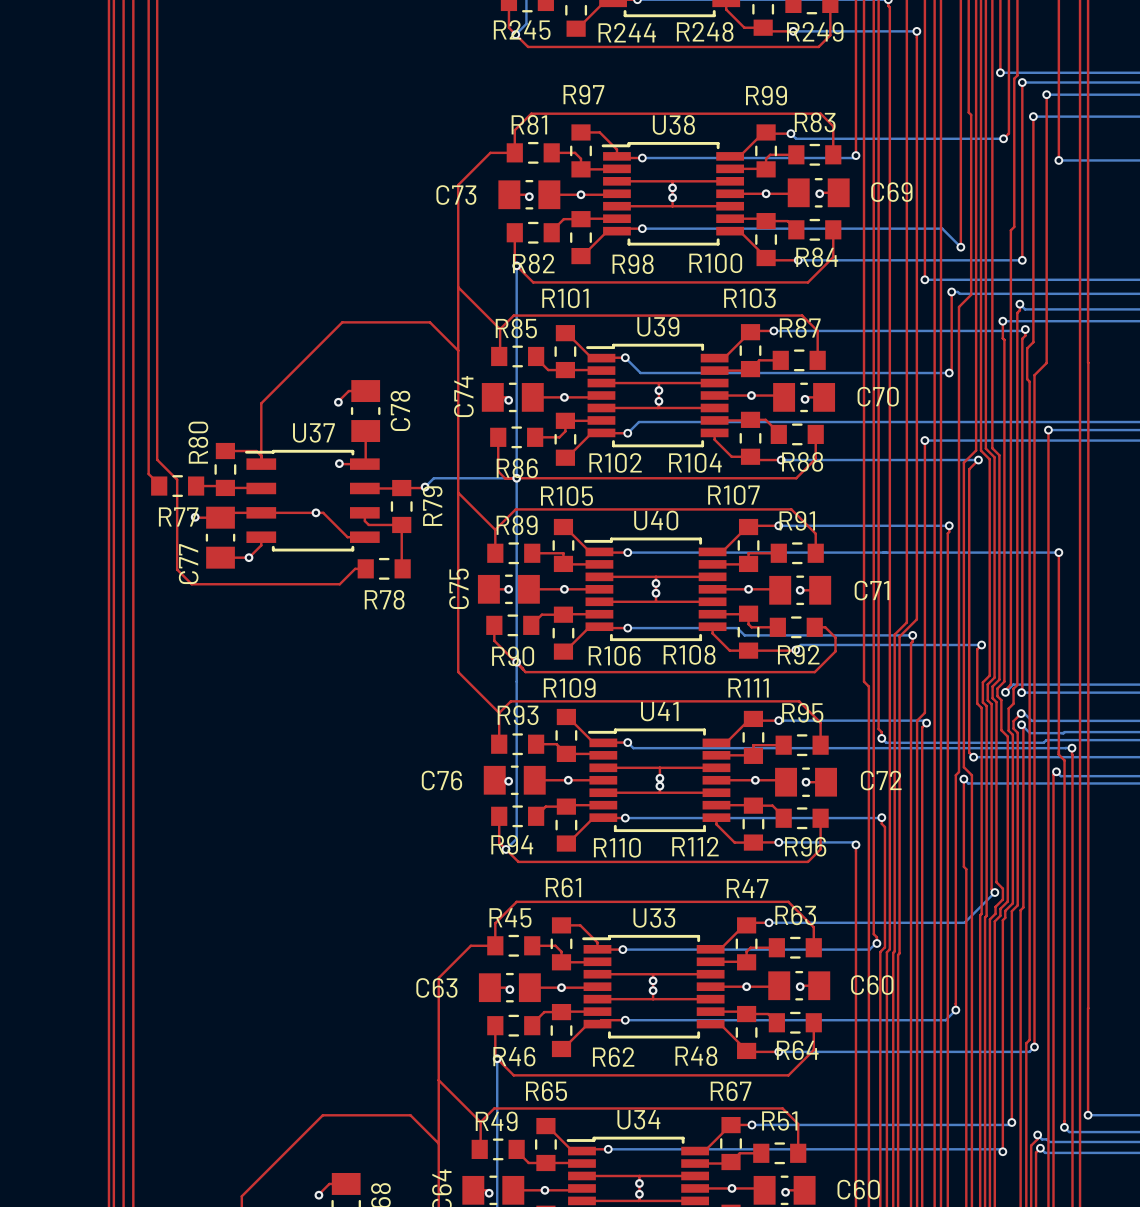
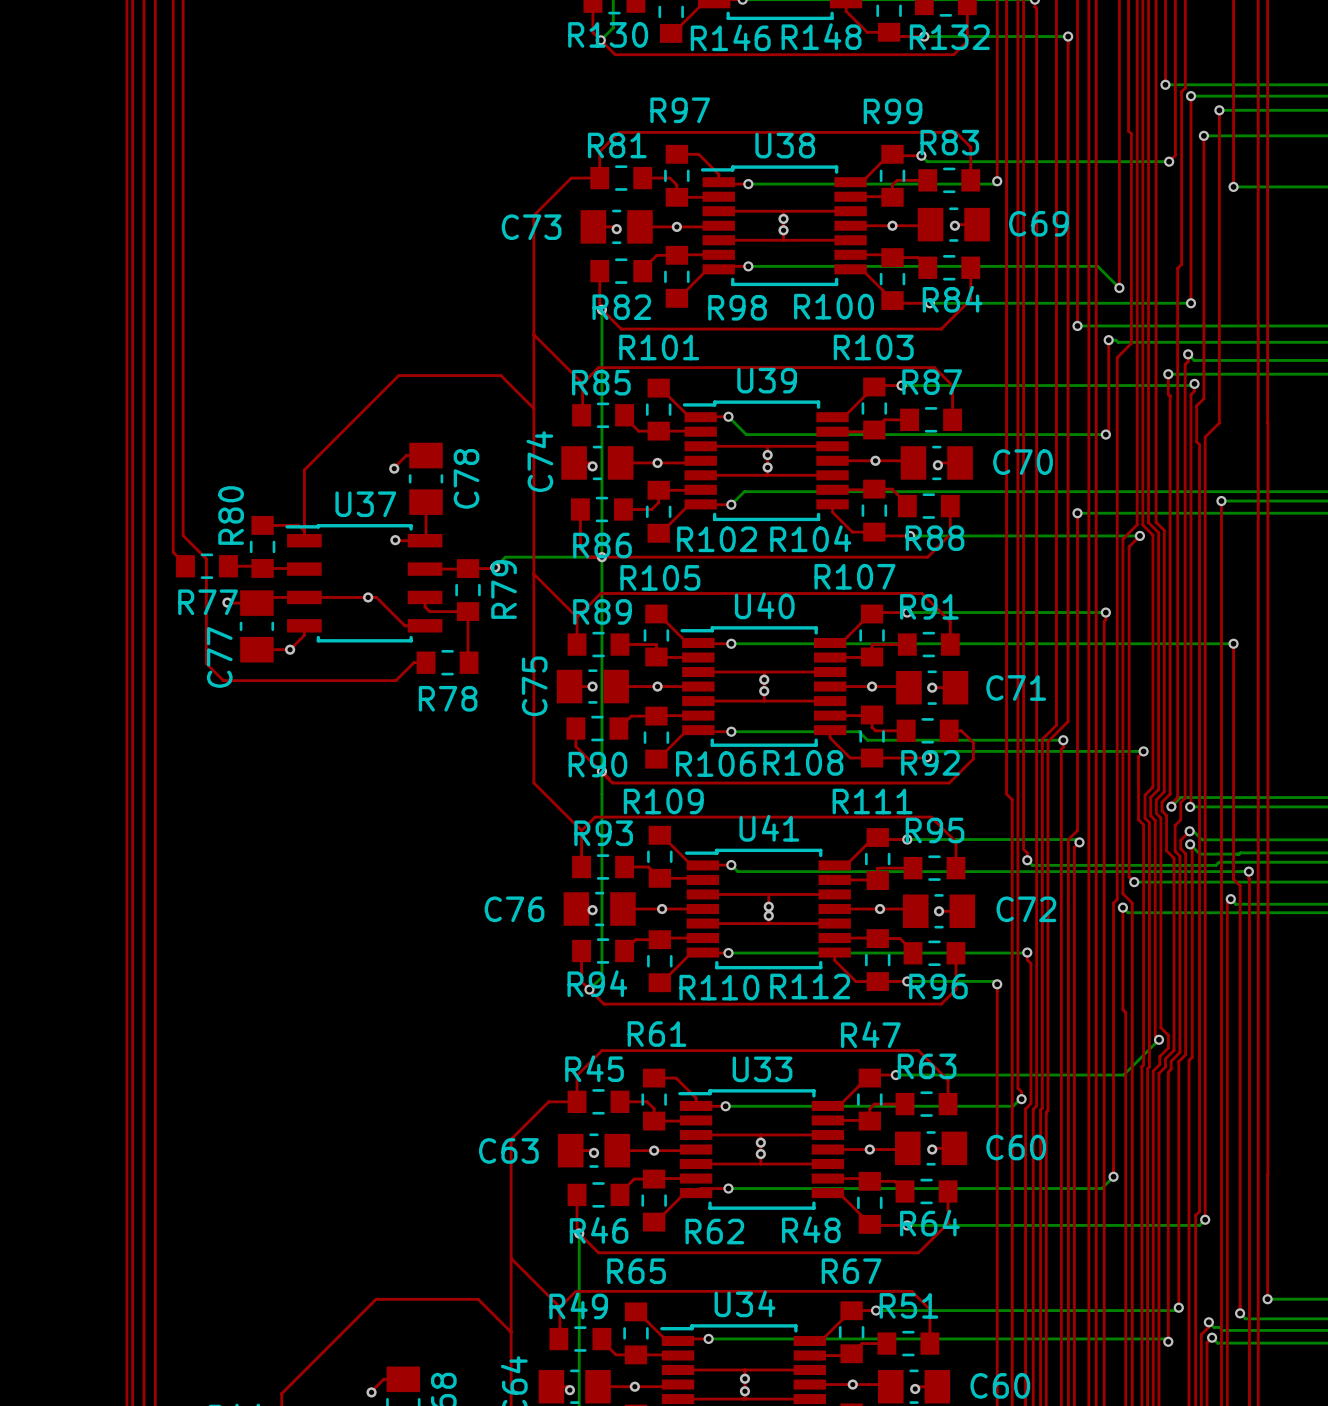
R245 name: R245 (522, 29) -> R130 (608, 34)
R248 name: R248 (705, 31) -> R148 (821, 36)
R249 name: R249 (815, 31) -> R132 (949, 37)
R244 name: R244 (627, 32) -> R146 (730, 37)

